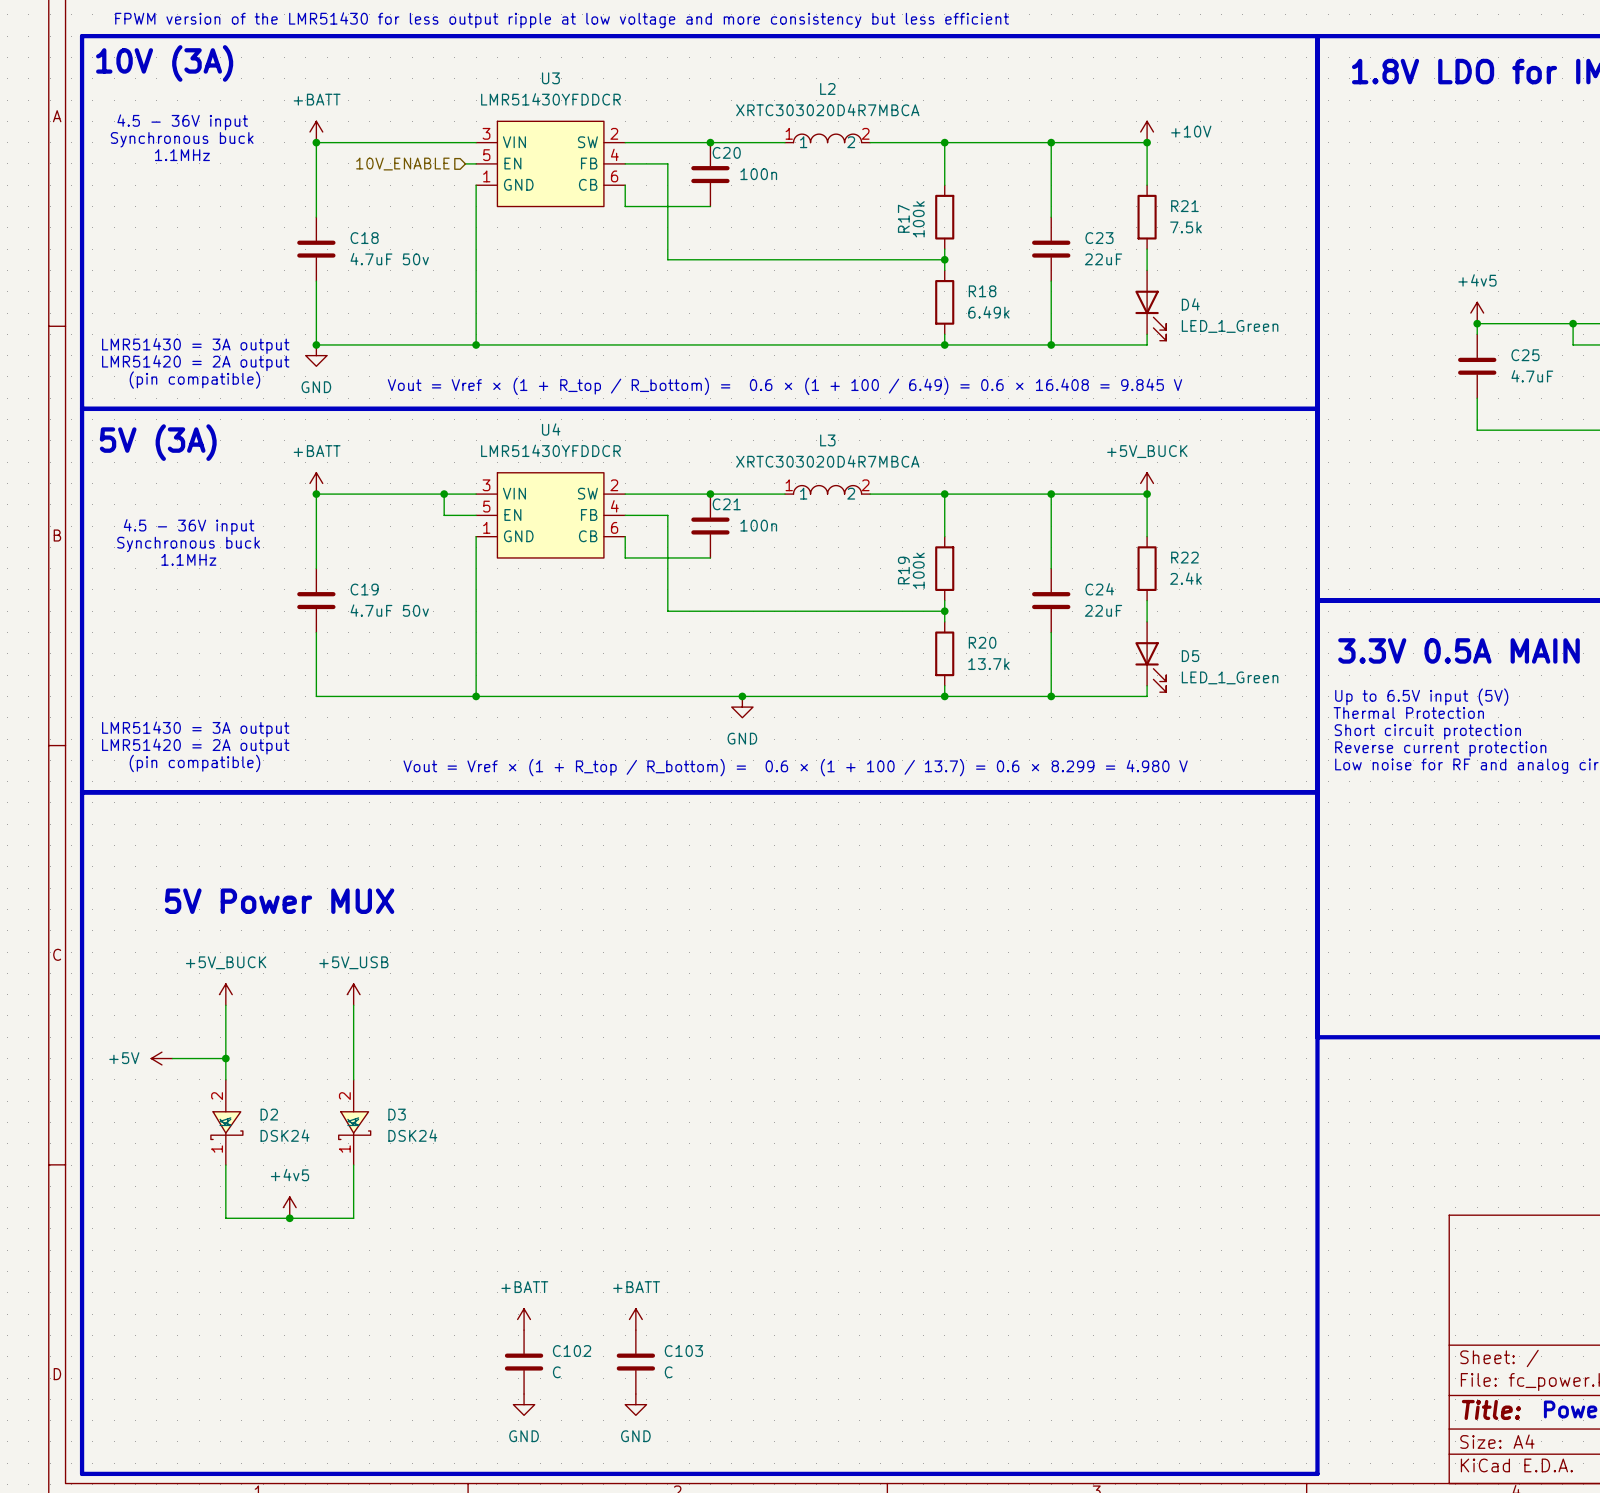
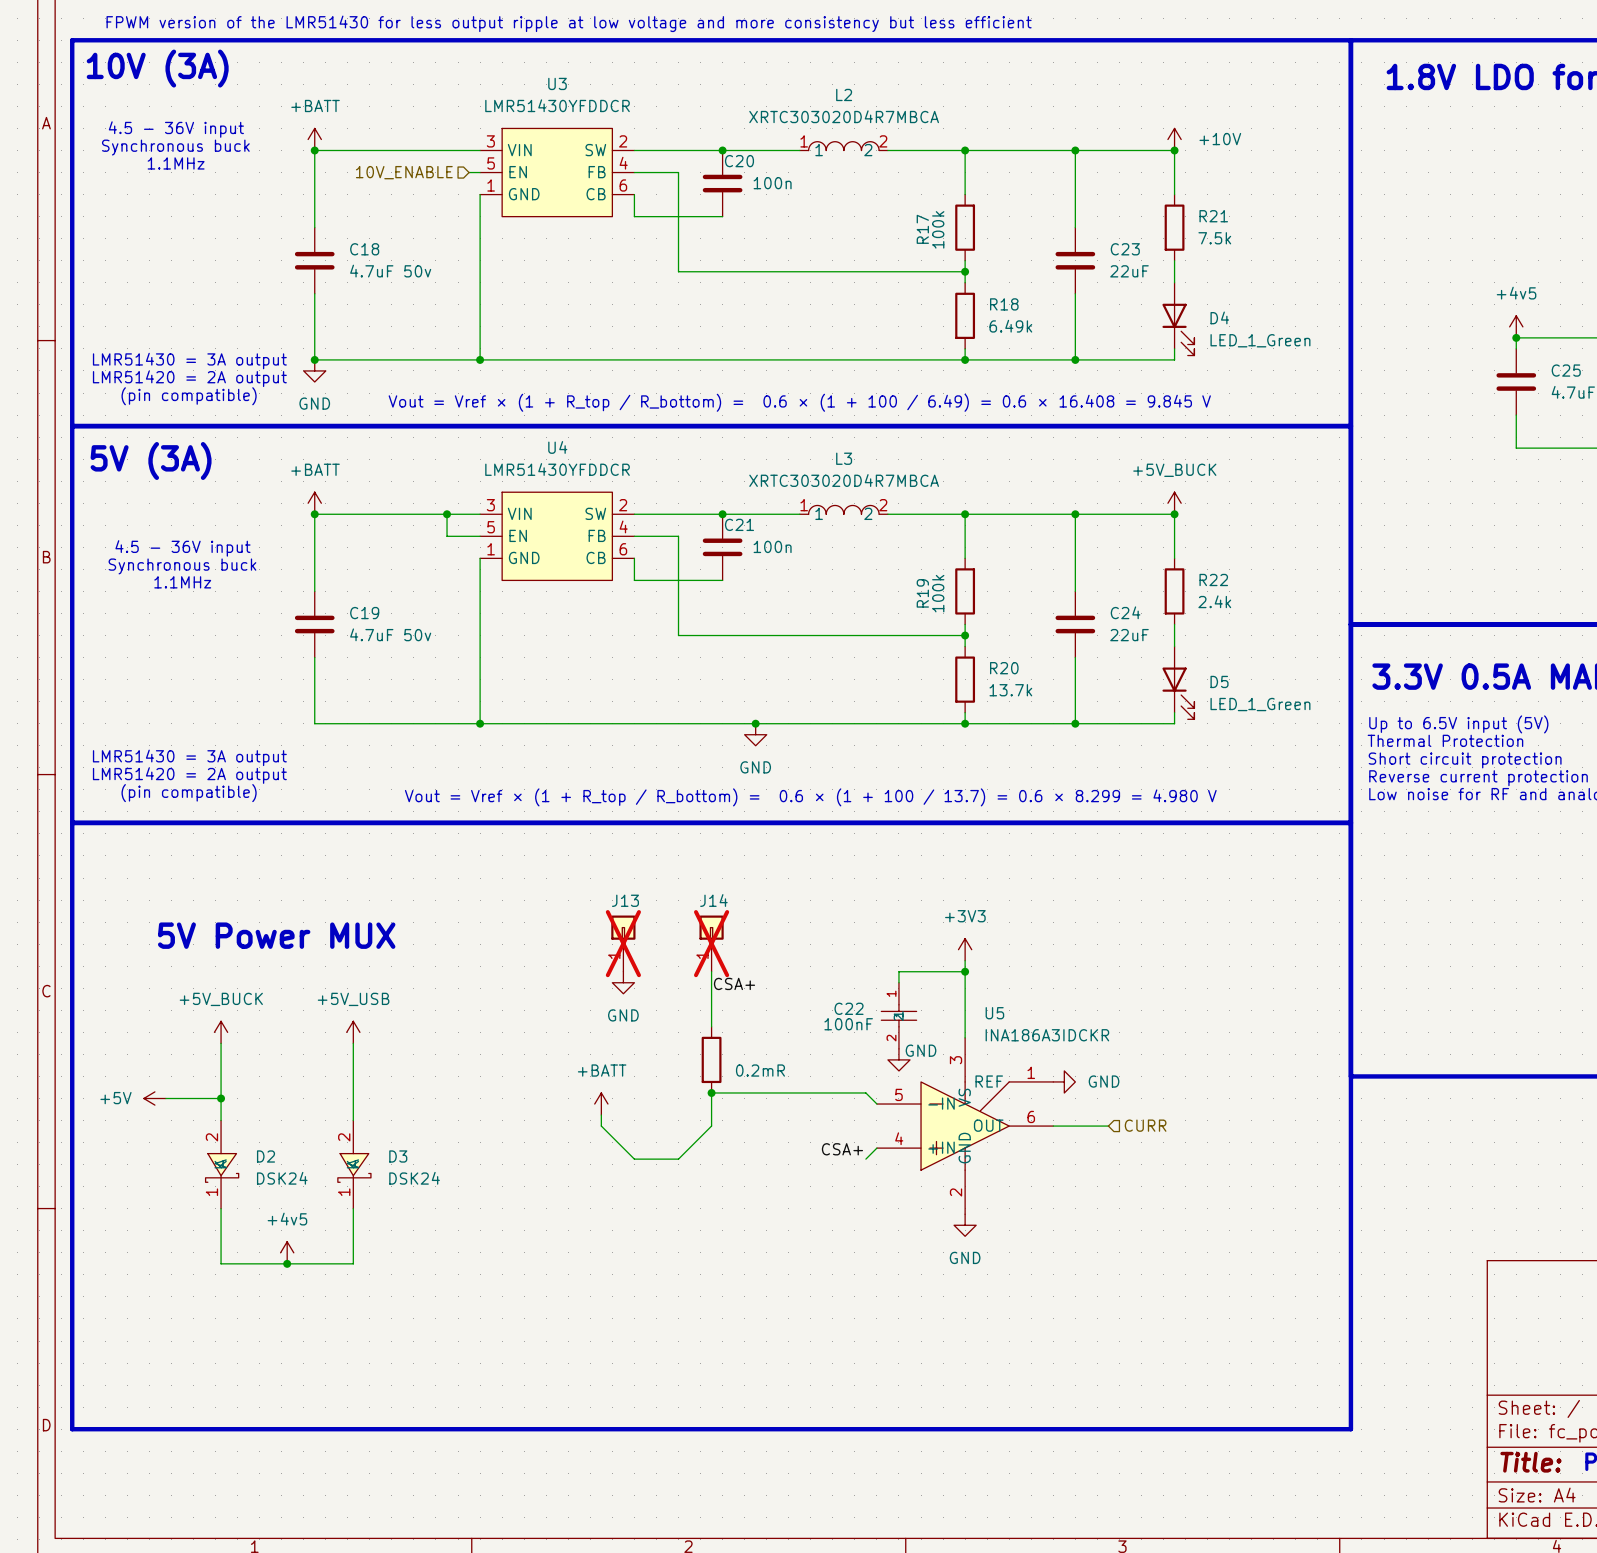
J13: none -> (623, 943)
J14: none -> (711, 943)
power symbol: none -> +3V3 (965, 949)
wire: none -> (965, 960) (965, 1037)
wire: none -> (711, 971) (711, 1026)
wire: none -> (965, 971) (898, 971) (898, 982)
junction: none -> (965, 971)
power symbol: none -> GND (623, 982)
label: none -> CSA+ (734, 983)
C22: none -> 100nF (898, 1015)
part: none -> 0.2mR (711, 1059)
power symbol: none -> GND (898, 1059)
power symbol: none -> GND (1064, 1081)
junction: none -> (711, 1092)
power symbol: none -> +BATT (601, 1104)
wire: none -> (876, 1104) (865, 1092) (711, 1092) (711, 1126) (678, 1159) (634, 1159) (601, 1126) (601, 1115)
hierarchical label: none -> CURR (1145, 1125)
U5: none -> INA186A3IDCKR (965, 1126)
wire: none -> (1053, 1126) (1108, 1126)
wire: none -> (876, 1148) (865, 1159)
label: none -> CSA+ (842, 1149)
power symbol: none -> GND (965, 1225)
power symbol: +BATT (524, 1319) -> none
power symbol: +BATT (635, 1319) -> none
C102: C (524, 1362) -> none
C103: C (635, 1362) -> none
line: (82, 1378) (82, 1473) (1317, 1473) (1317, 1378) -> (72, 1429) (1350, 1429)
power symbol: GND (524, 1404) -> none
power symbol: GND (635, 1404) -> none

